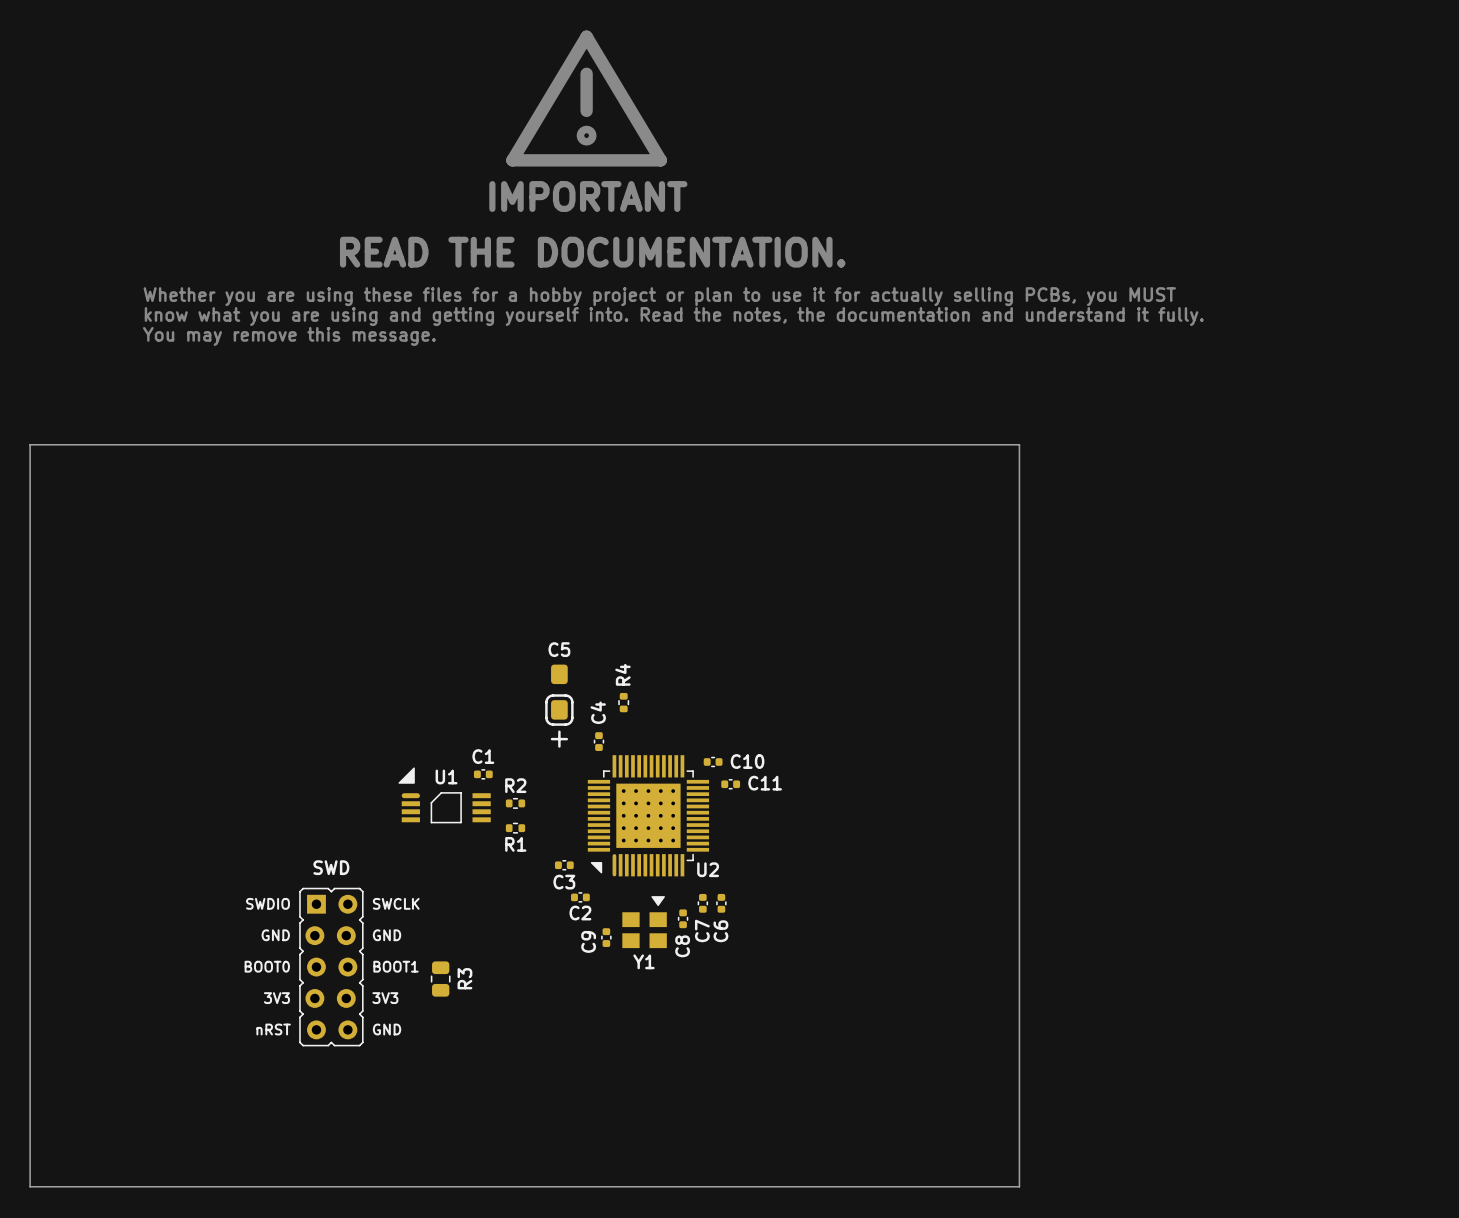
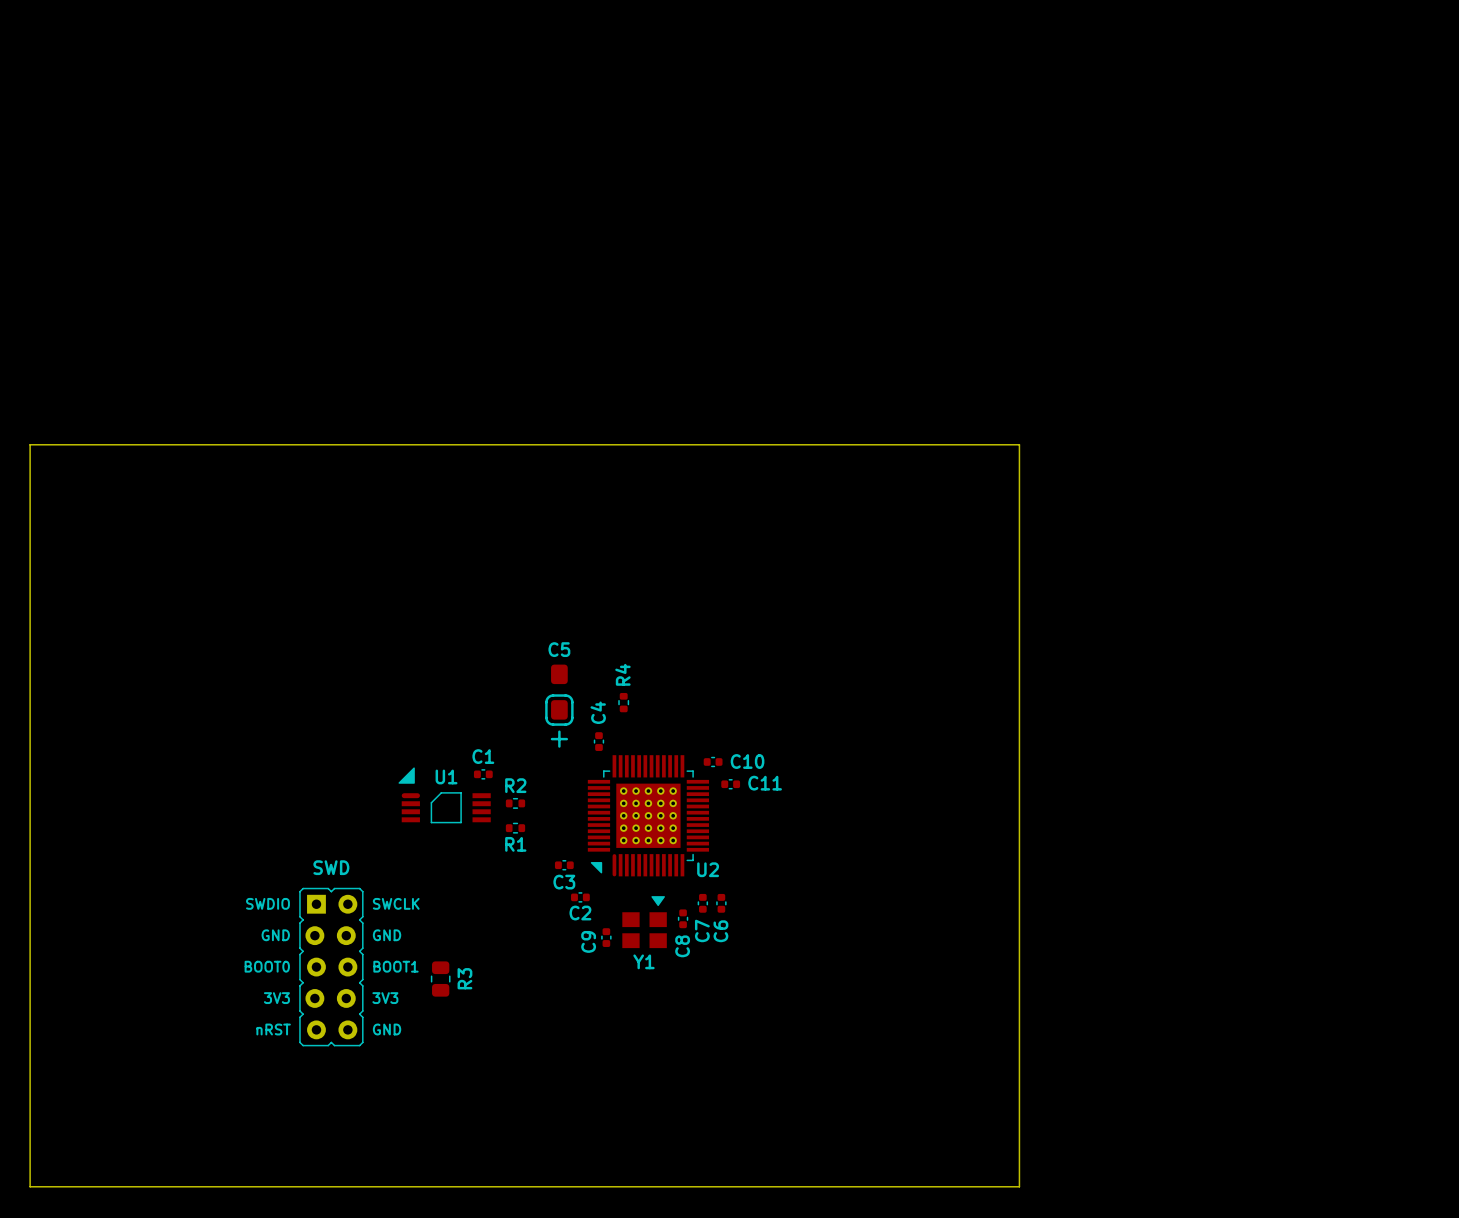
line: (586, 36) (660, 160) (512, 160) (586, 36) -> none
line: (586, 73) (586, 110) -> none
drawing: [576, 125, 597, 146] -> none
text: IMPORTANT (588, 196) -> none
text: READ THE DOCUMENTATION. (592, 252) -> none
text: Whether you are using these files for a hobby project or plan to use it for actually selling PCBs, you MUST (659, 296) -> none
text: know what you are using and getting yourself into. Read the notes, the documentation and understand it fully. (674, 316) -> none
text: You may remove this message. (289, 336) -> none

